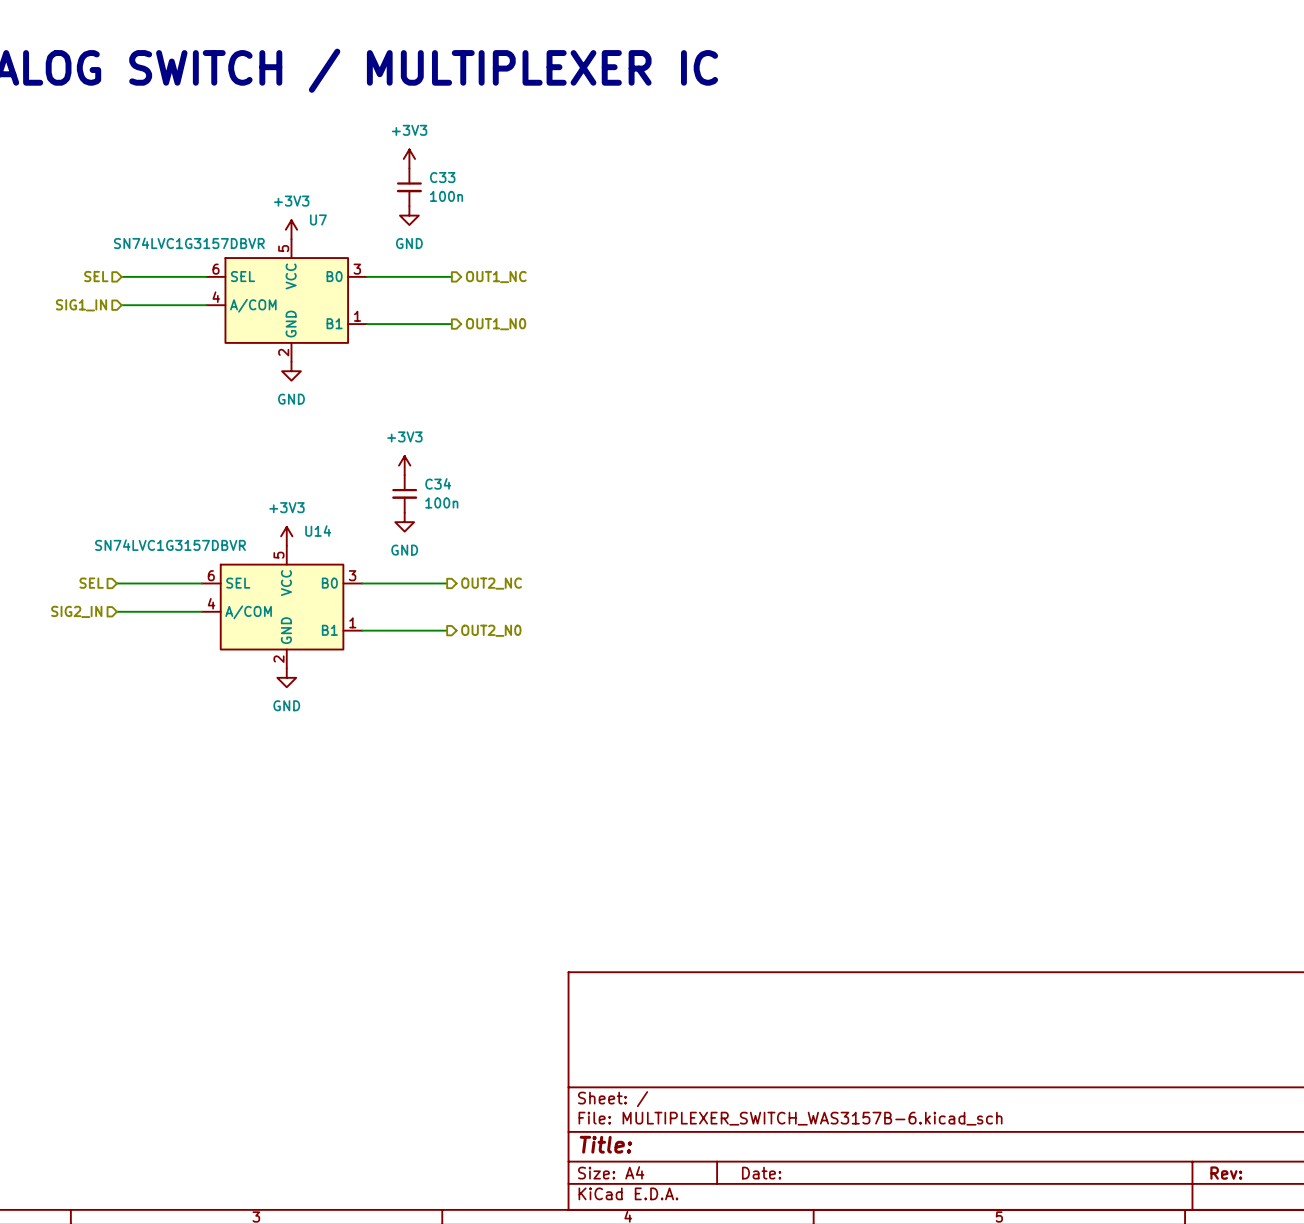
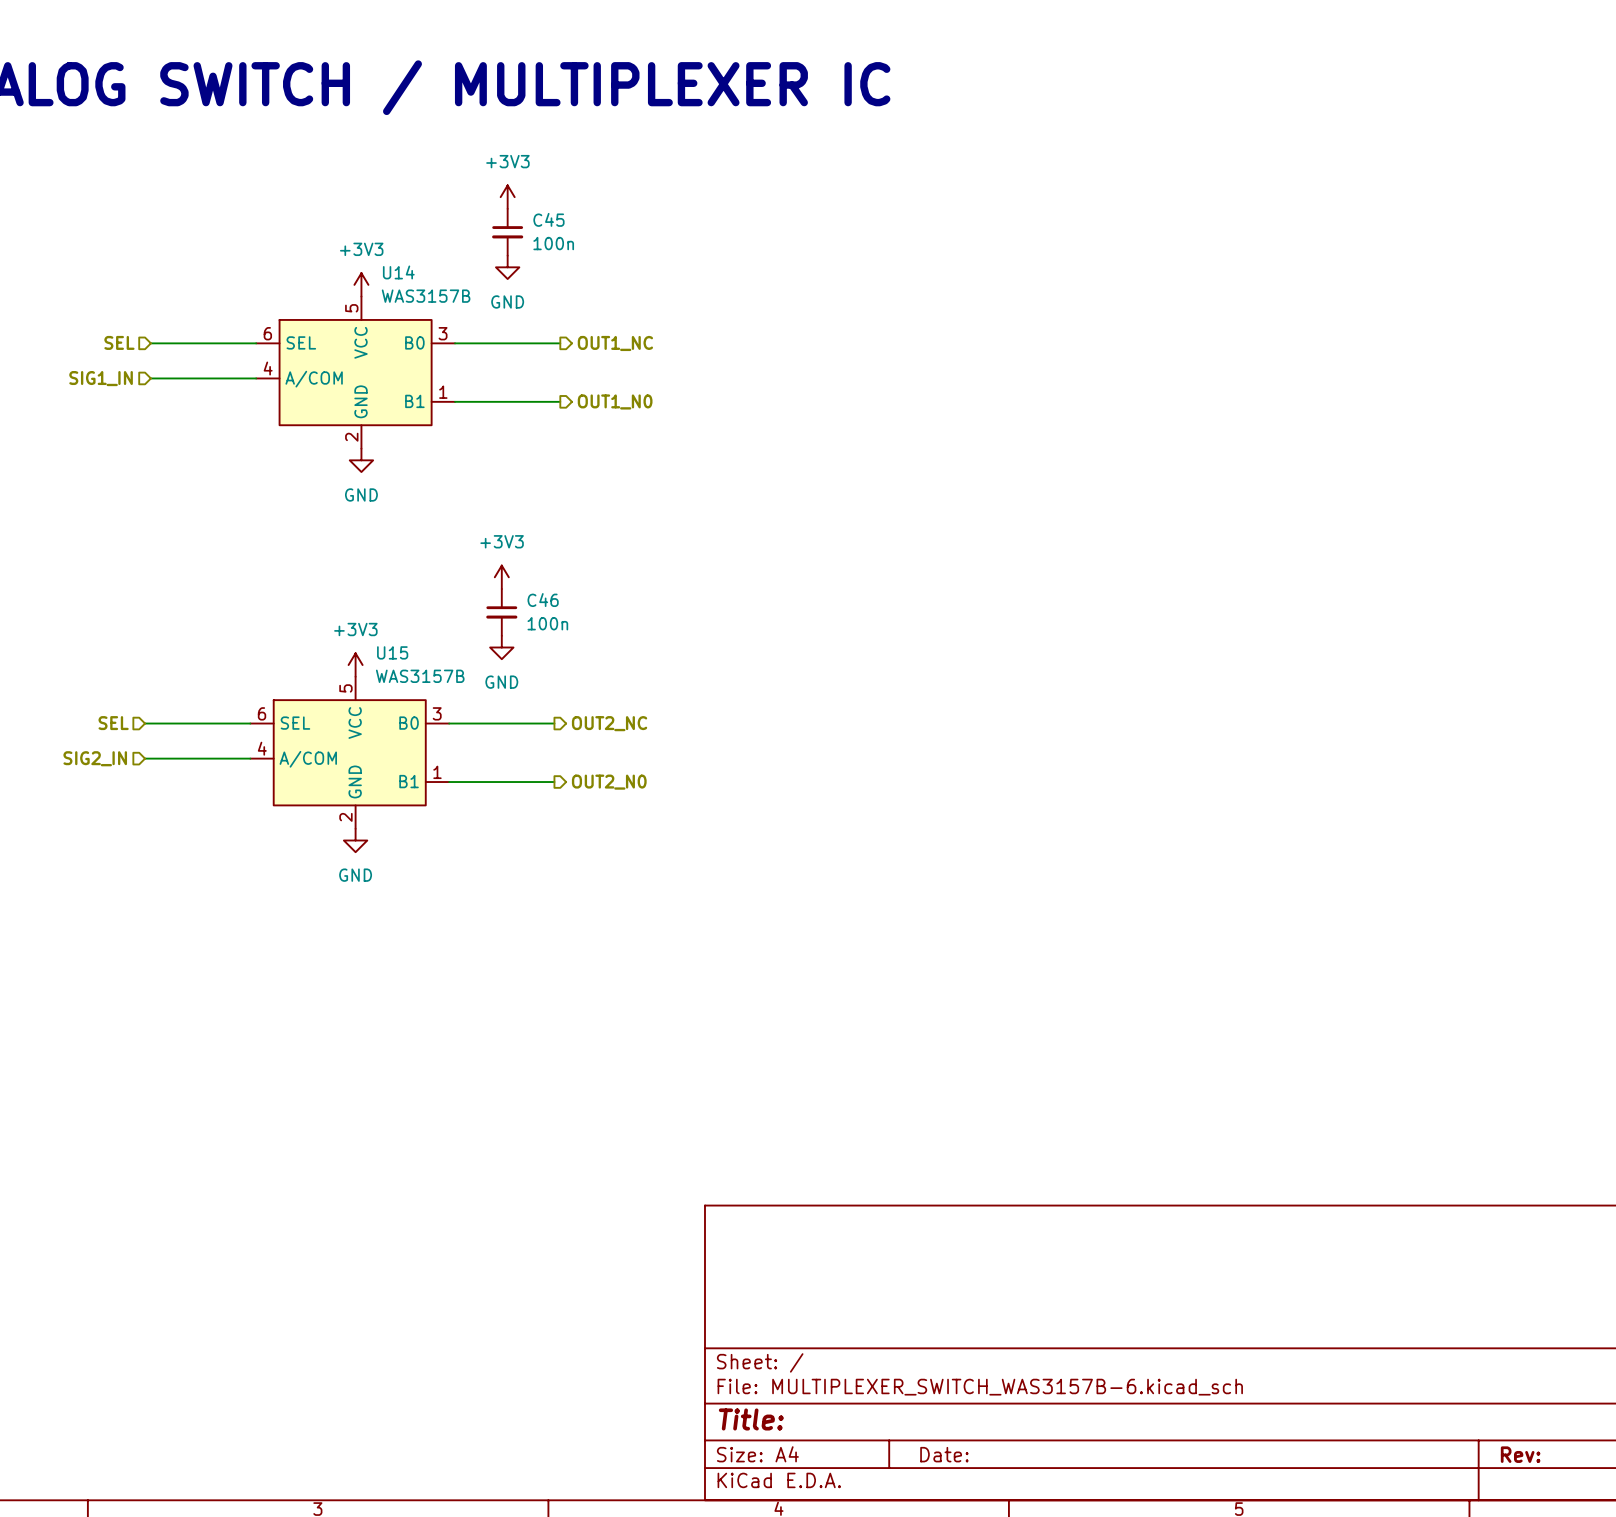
C33 name: C33 (442, 177) -> C45 (548, 219)
U7 name: U7 (318, 219) -> U14 (398, 272)
U7 value: SN74LVC1G3157DBVR (189, 243) -> WAS3157B (426, 296)
C34 name: C34 (438, 483) -> C46 (543, 600)
U14 name: U14 (318, 531) -> U15 (392, 652)
U14 value: SN74LVC1G3157DBVR (170, 545) -> WAS3157B (420, 676)

